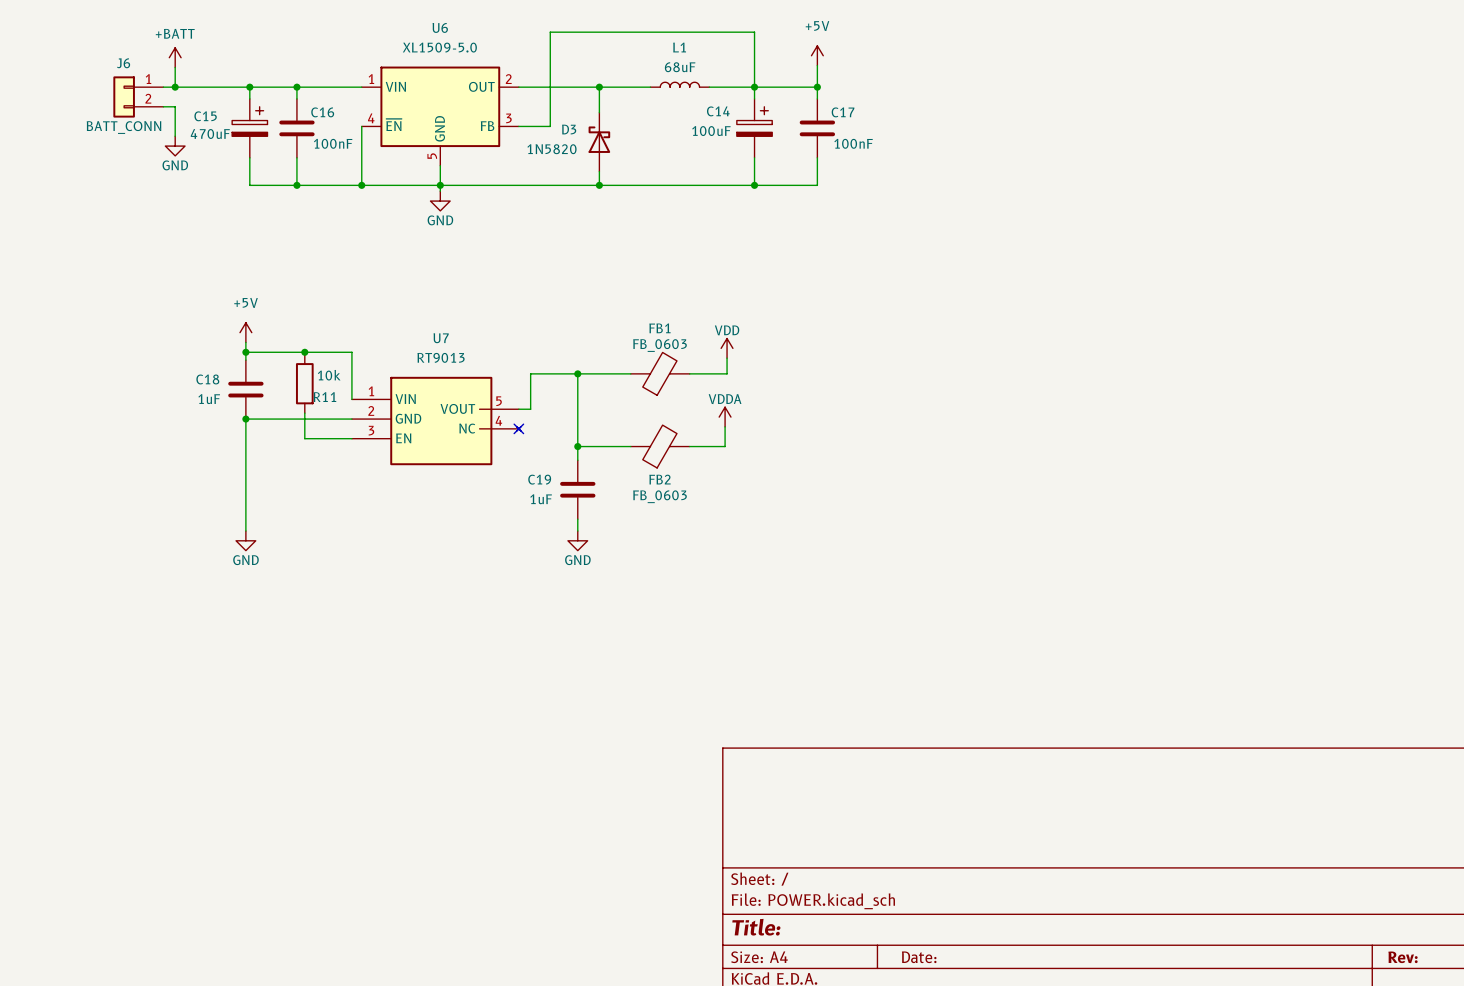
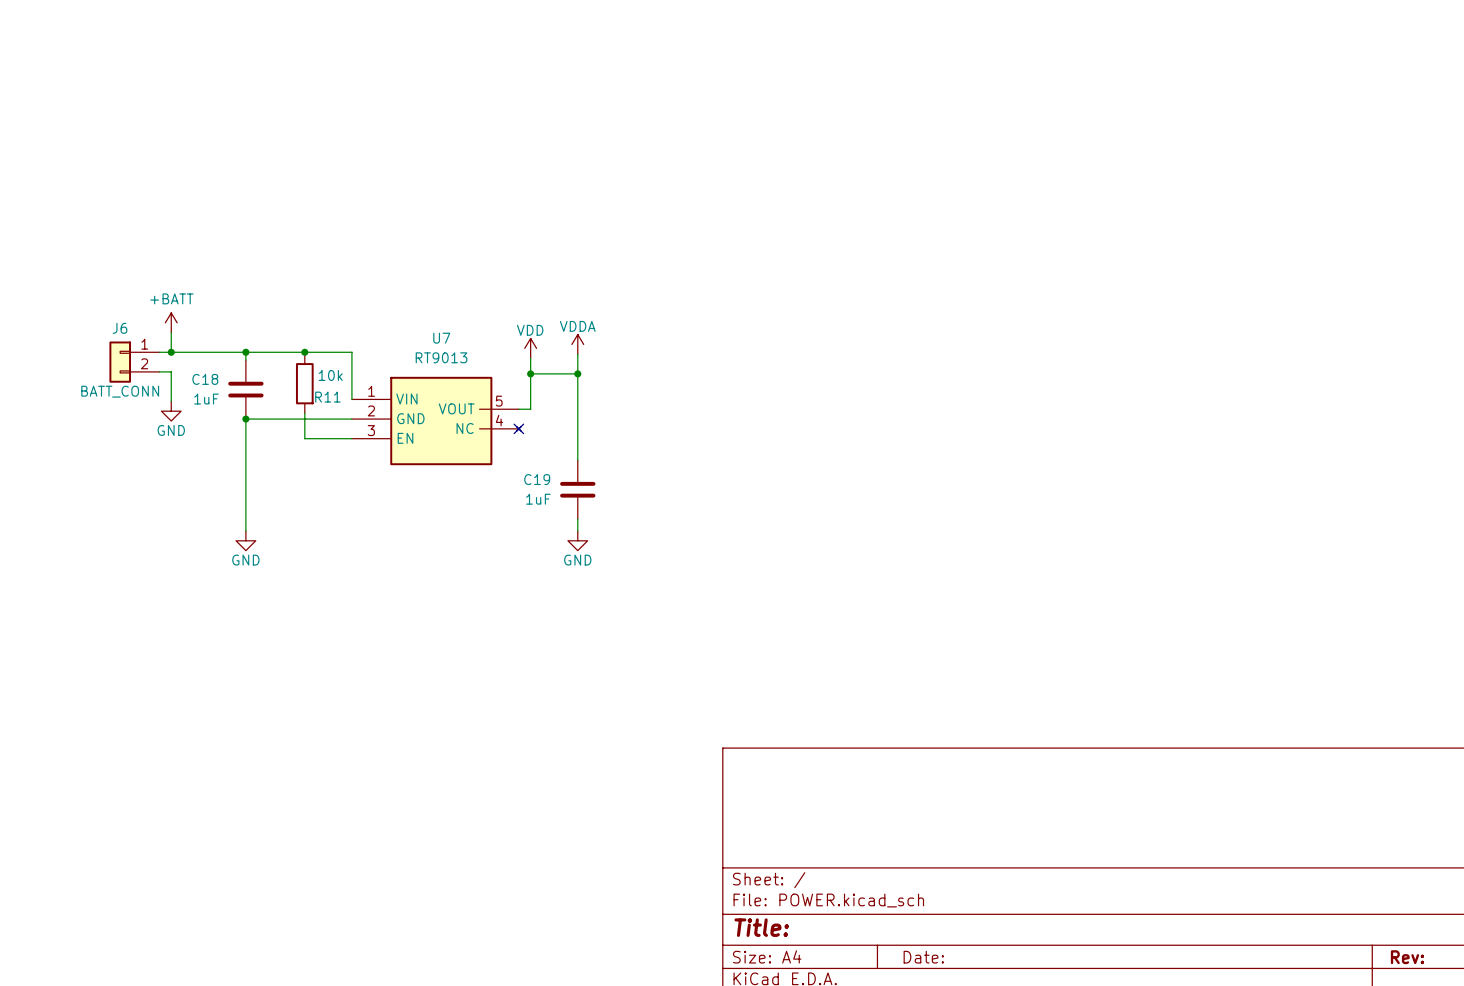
power symbol: +5V (817, 55) -> none
power symbol: +BATT (175, 57) -> none
wire: (817, 65) (817, 98) -> none
wire: (175, 67) (175, 87) -> none
L1: 68uF (679, 84) -> none
wire: (163, 87) (361, 87) -> none
junction: (175, 87) -> none
wire: (249, 87) (249, 98) -> none
junction: (249, 87) -> none
wire: (296, 87) (296, 98) -> none
junction: (296, 87) -> none
wire: (518, 87) (650, 87) -> none
wire: (599, 87) (599, 112) -> none
junction: (599, 87) -> none
wire: (709, 87) (817, 87) -> none
junction: (754, 87) -> none
junction: (817, 87) -> none
J6 position: (138, 96) -> (134, 362)
wire: (754, 98) (754, 32) (550, 32) (550, 126) (518, 126) -> none
wire: (163, 106) (175, 106) (175, 136) -> none
U6: XL1509-5.0 (440, 116) -> none
wire: (361, 126) (361, 185) -> none
C15: 470uF (249, 128) -> none
C16: 100nF (296, 128) -> none
C14: 100uF (754, 128) -> none
C17: 100nF (817, 128) -> none
D3: 1N5820 (599, 142) -> none
power symbol: GND (175, 146) -> none
wire: (249, 157) (249, 185) (817, 185) (817, 157) -> none
wire: (296, 157) (296, 185) -> none
wire: (754, 157) (754, 185) -> none
wire: (440, 165) (440, 191) -> none
wire: (599, 171) (599, 185) -> none
junction: (296, 185) -> none
junction: (361, 185) -> none
junction: (440, 185) -> none
junction: (599, 185) -> none
junction: (754, 185) -> none
power symbol: GND (440, 201) -> none
power symbol: none -> +BATT (171, 322)
wire: none -> (171, 332) (171, 352)
power symbol: +5V (245, 332) -> none
wire: (245, 342) (245, 352) -> (159, 352) (245, 352)
power symbol: none -> VDD (530, 348)
power symbol: VDD (727, 348) -> none
junction: none -> (171, 352)
wire: none -> (530, 358) (530, 373)
wire: (727, 358) (727, 373) (689, 373) -> none
wire: none -> (159, 371) (171, 371) (171, 401)
junction: none -> (530, 373)
wire: (577, 373) (630, 373) -> (577, 373) (577, 354)
FB1: FB_0603 (660, 373) -> none
power symbol: none -> GND (171, 411)
power symbol position: VDDA (725, 417) -> VDDA (577, 344)
wire: (725, 426) (725, 446) (689, 446) -> none
wire: (577, 446) (630, 446) -> none
junction: (577, 446) -> none
FB2: FB_0603 (660, 446) -> none

